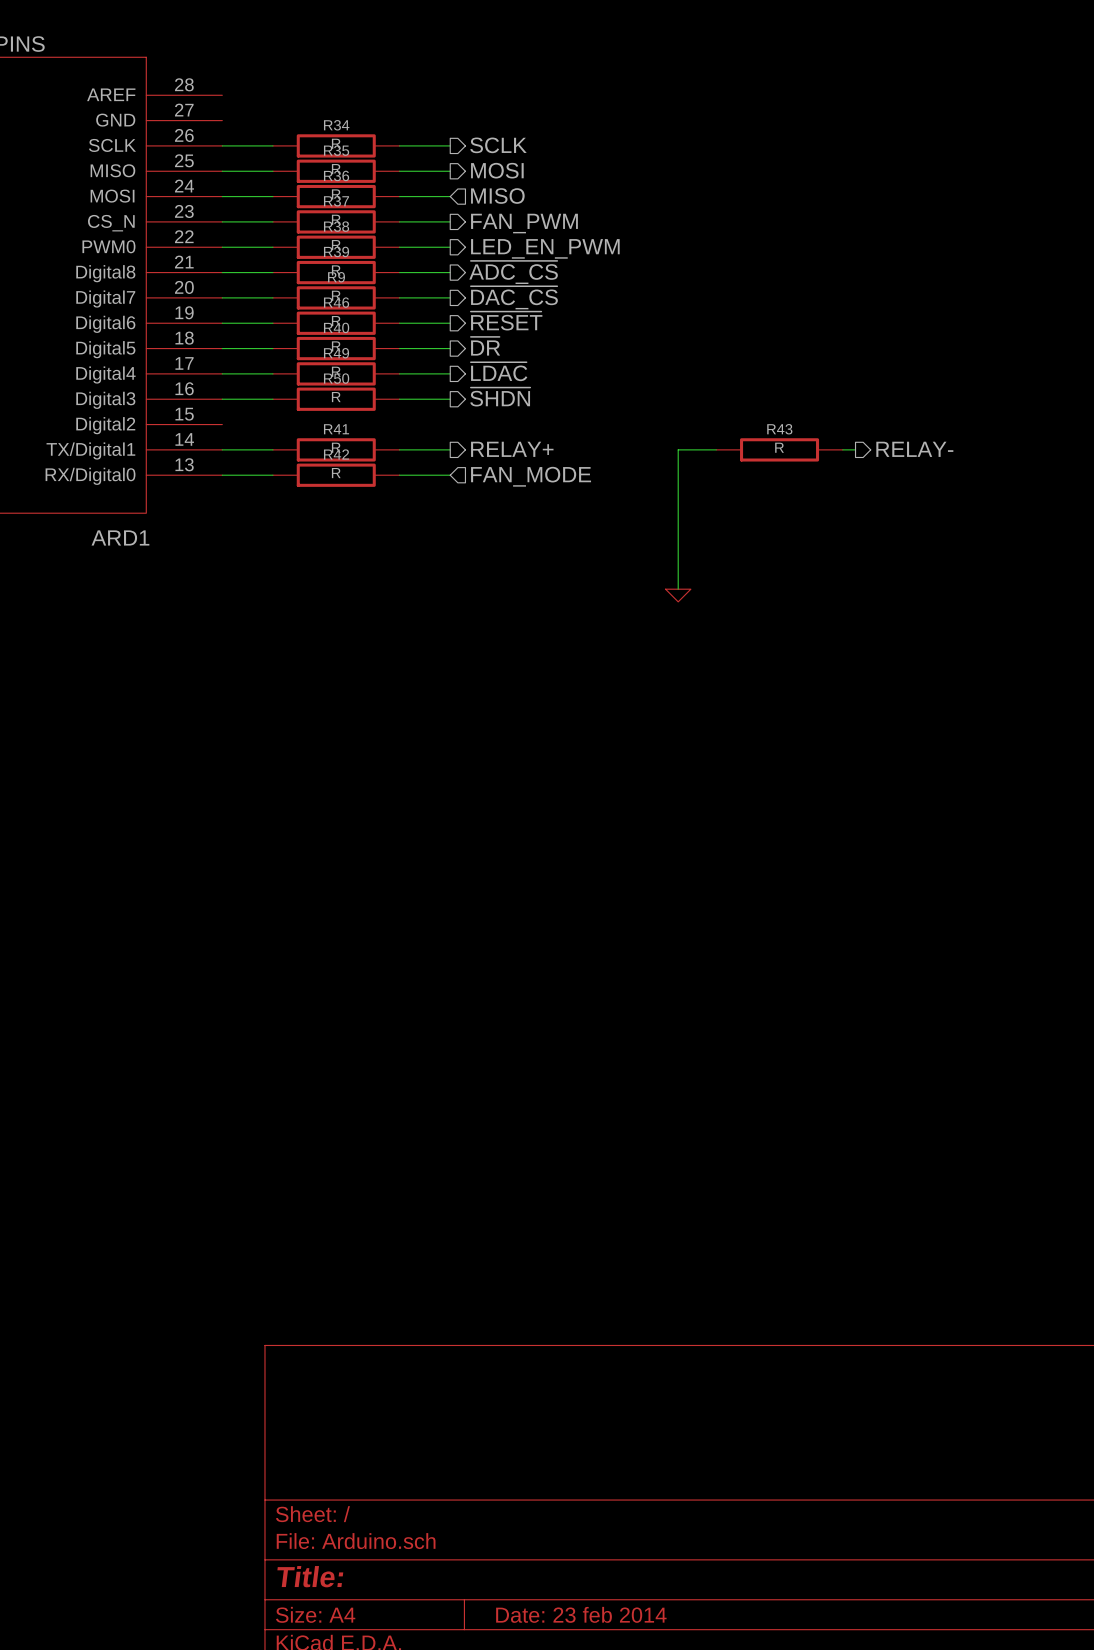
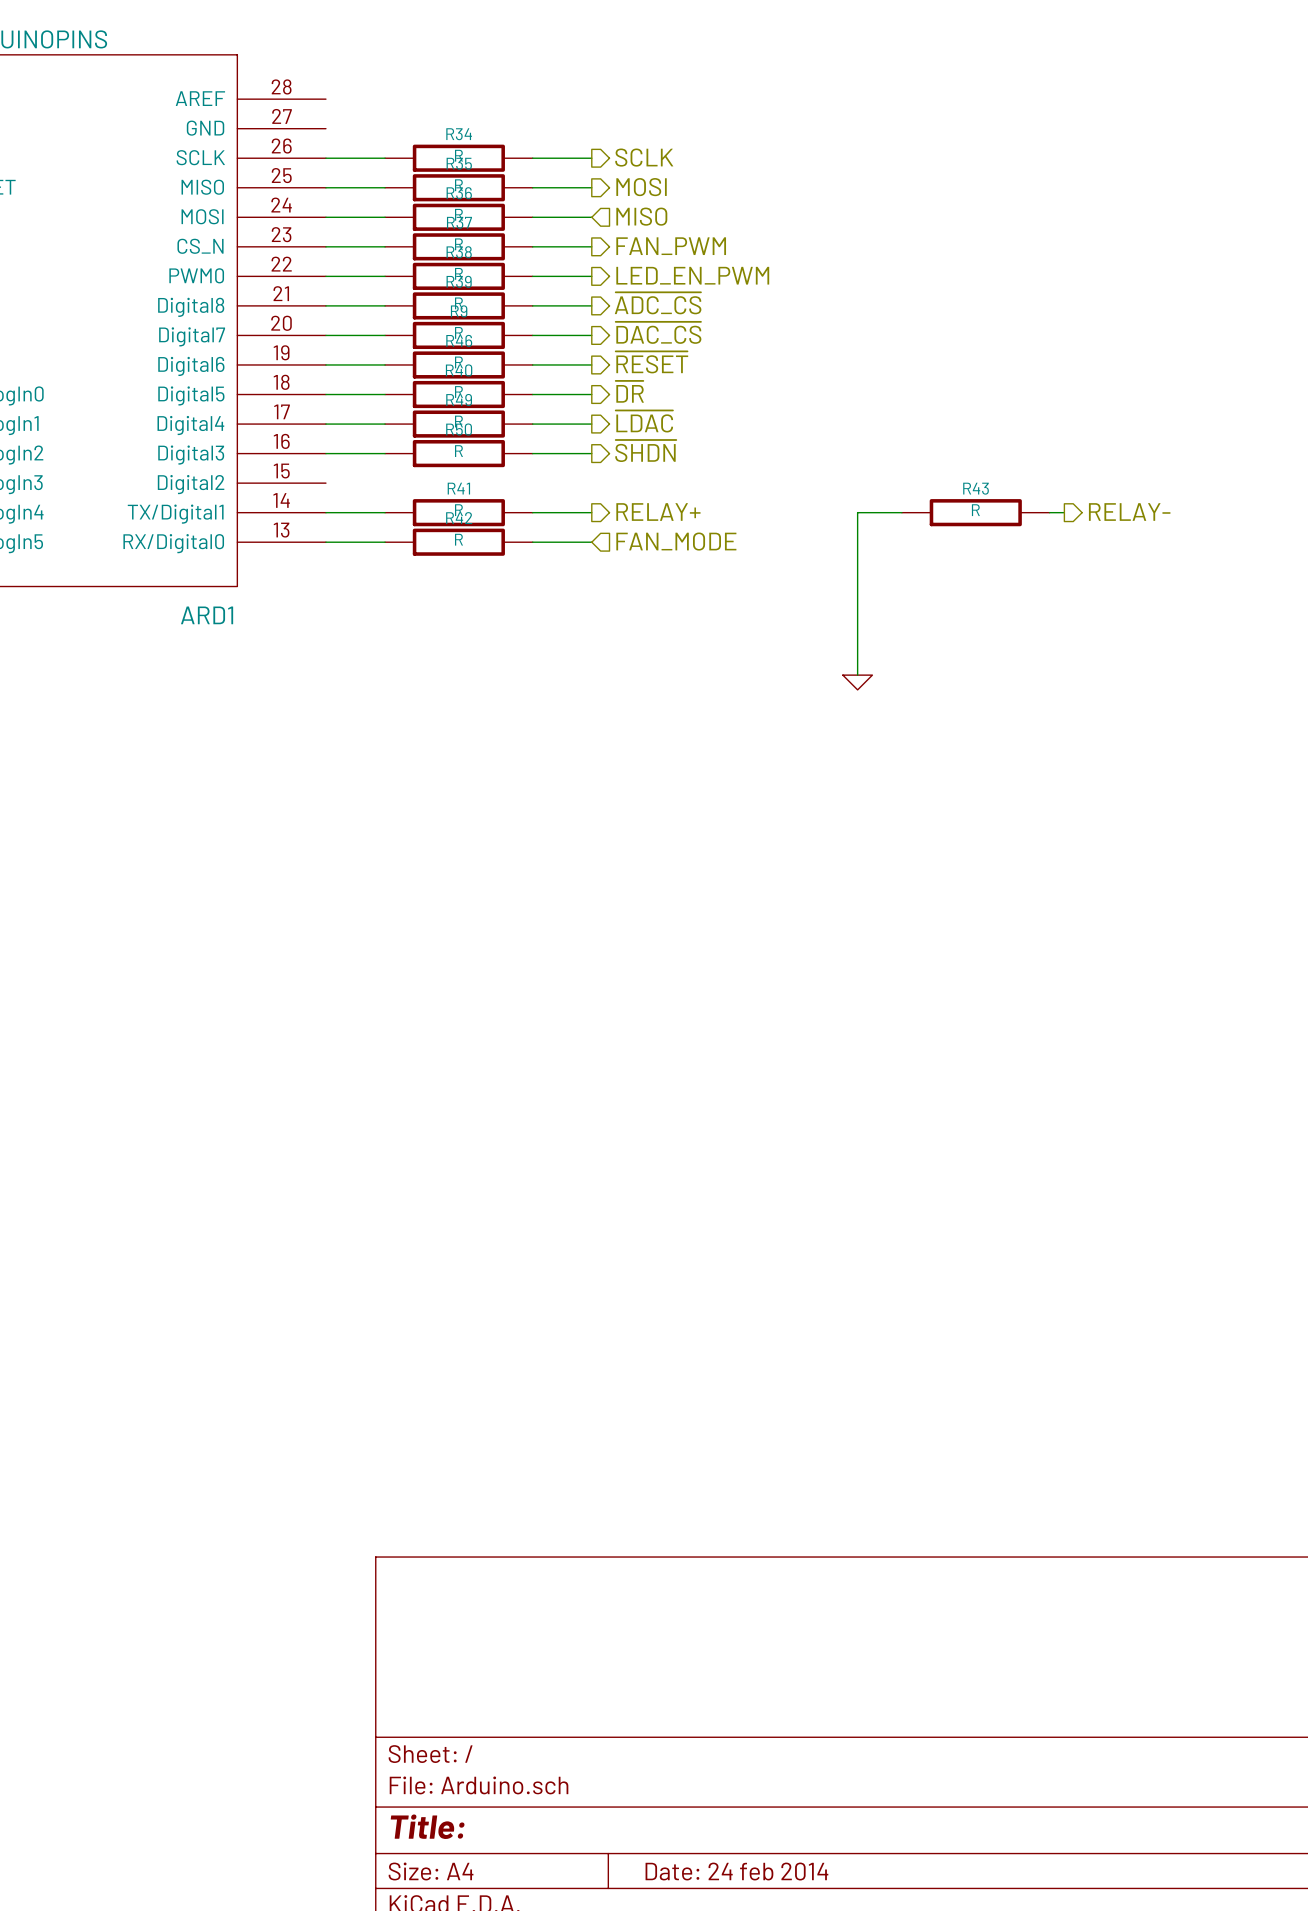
title block: Date: 23 feb 2014 (581, 1614) -> Date: 24 feb 2014 (736, 1871)

